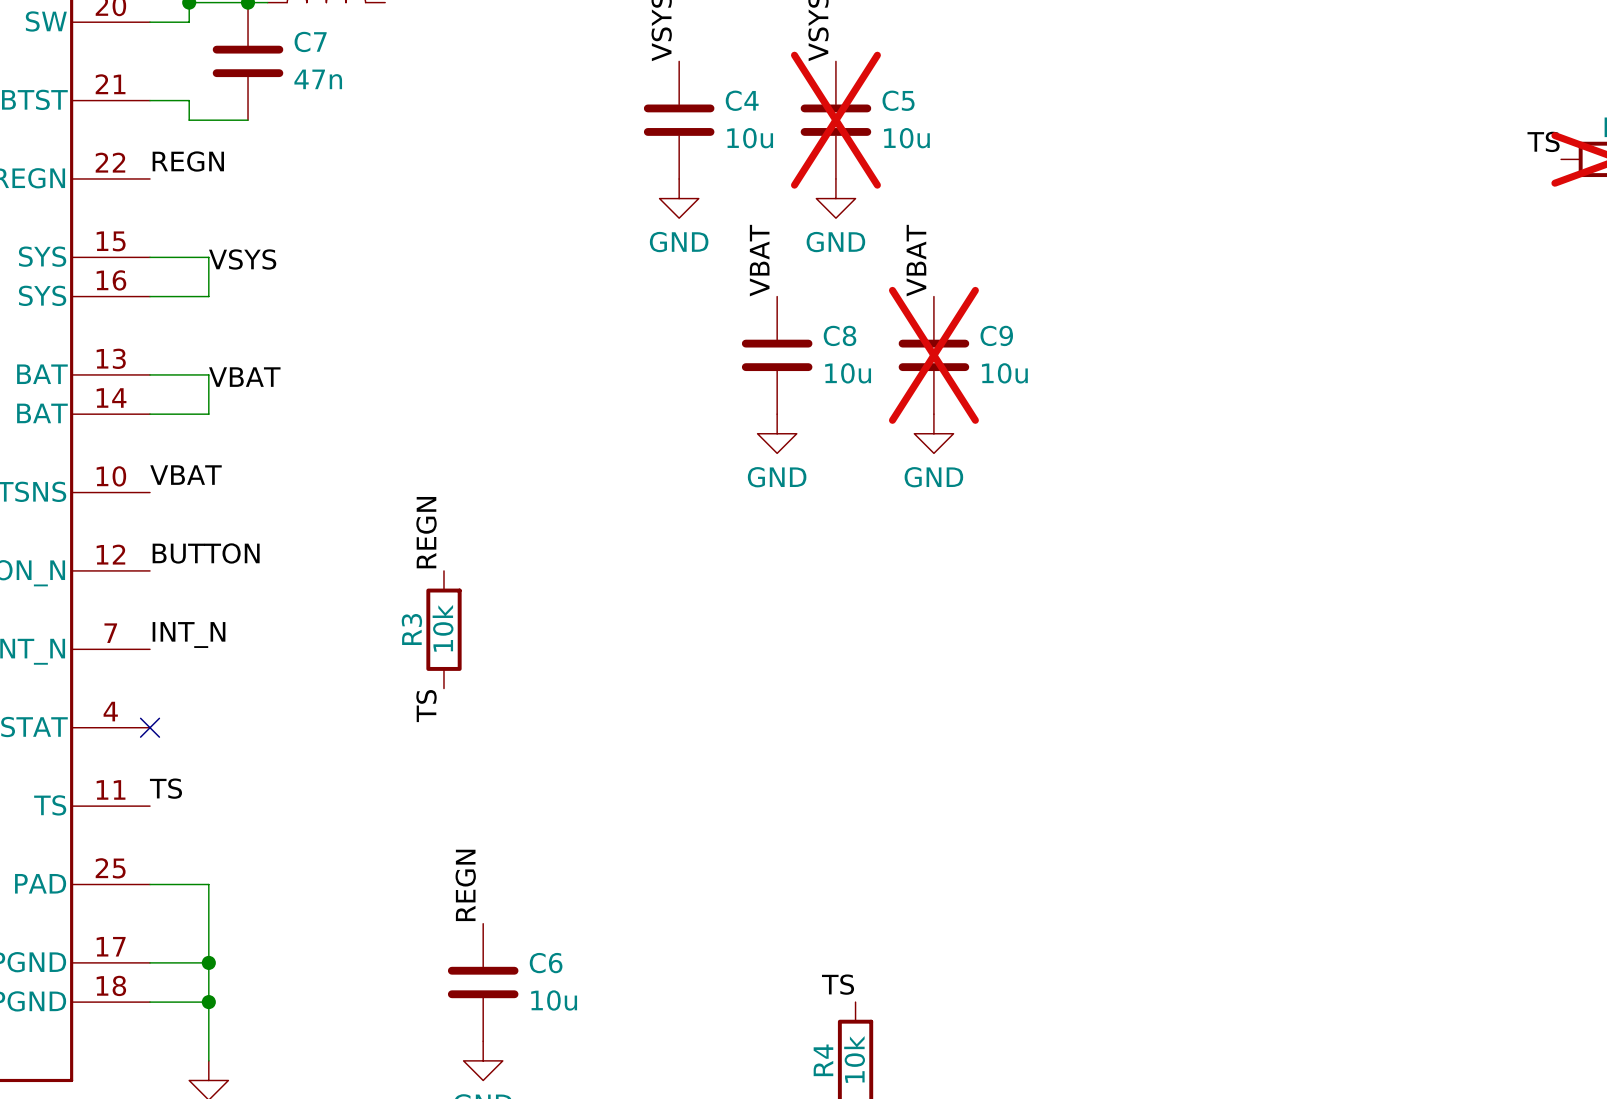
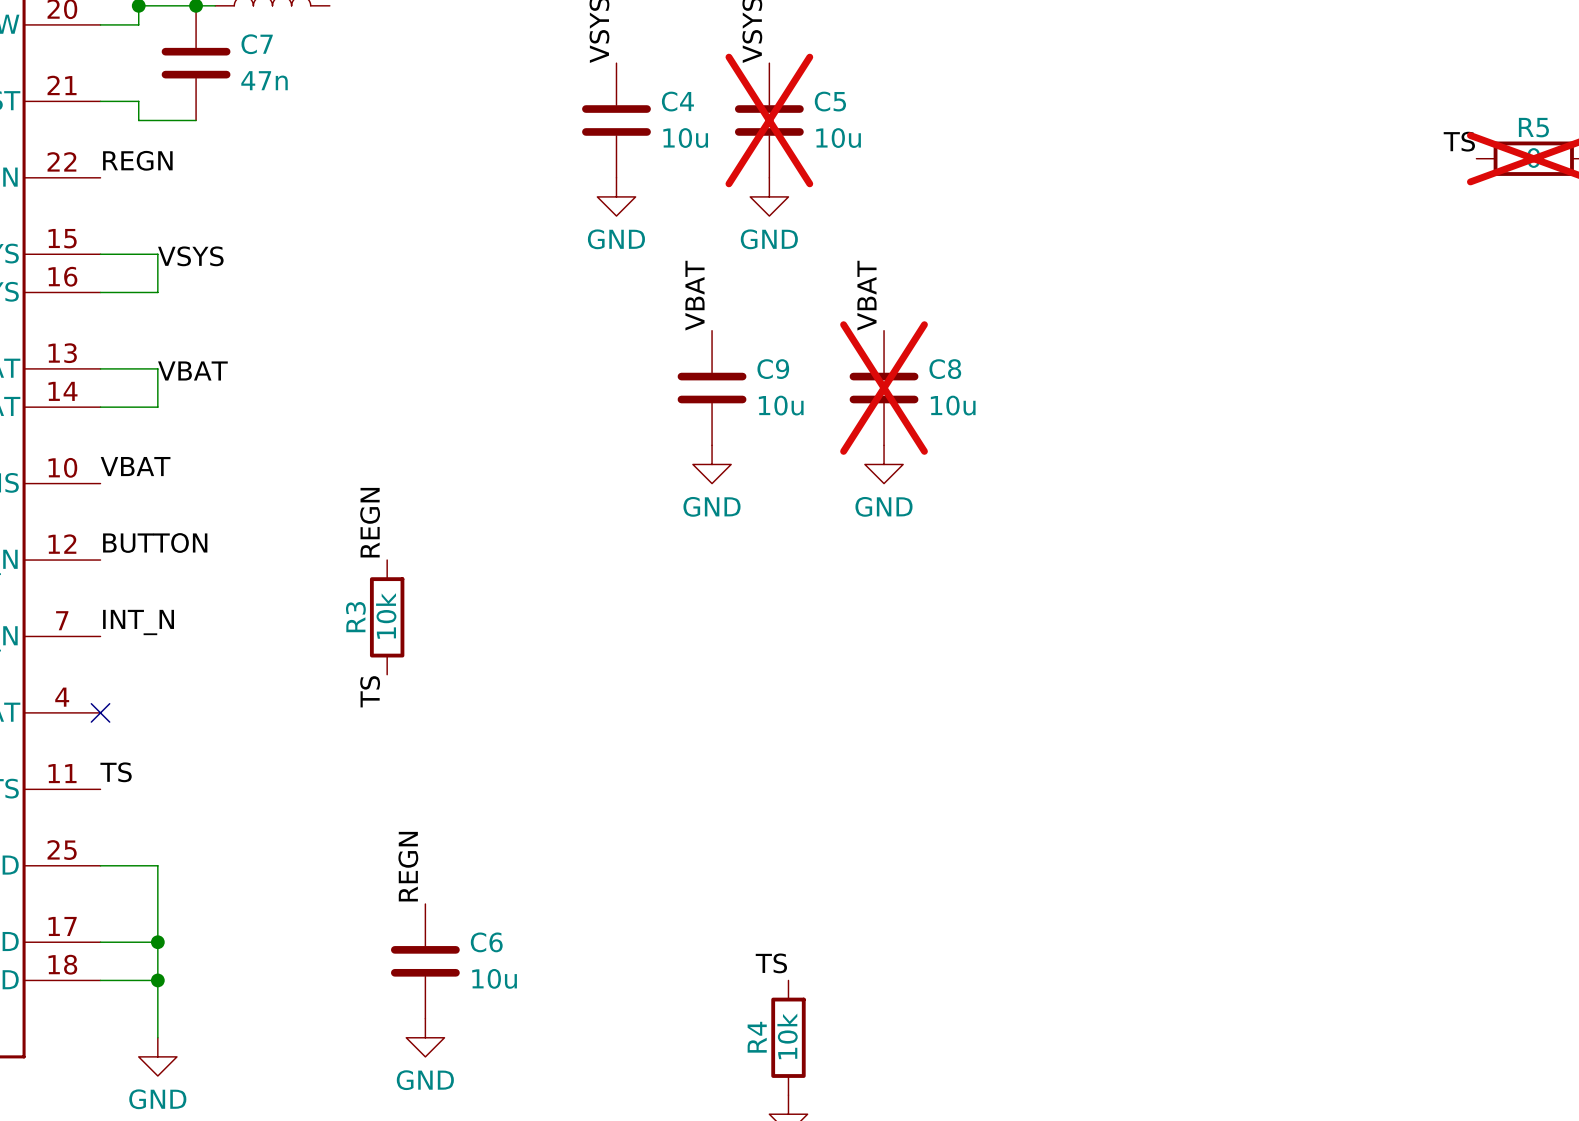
label position: VBAT (759, 260) -> VBAT (694, 295)
label position: VBAT (916, 260) -> VBAT (866, 295)
C8 position: (777, 355) -> (884, 388)
C9 position: (933, 355) -> (712, 388)
C9 do-not-place cross: (933, 355) -> none
C8 do-not-place cross: none -> (884, 388)
power symbol position: GND (777, 433) -> GND (712, 464)
power symbol position: GND (933, 433) -> GND (884, 464)

